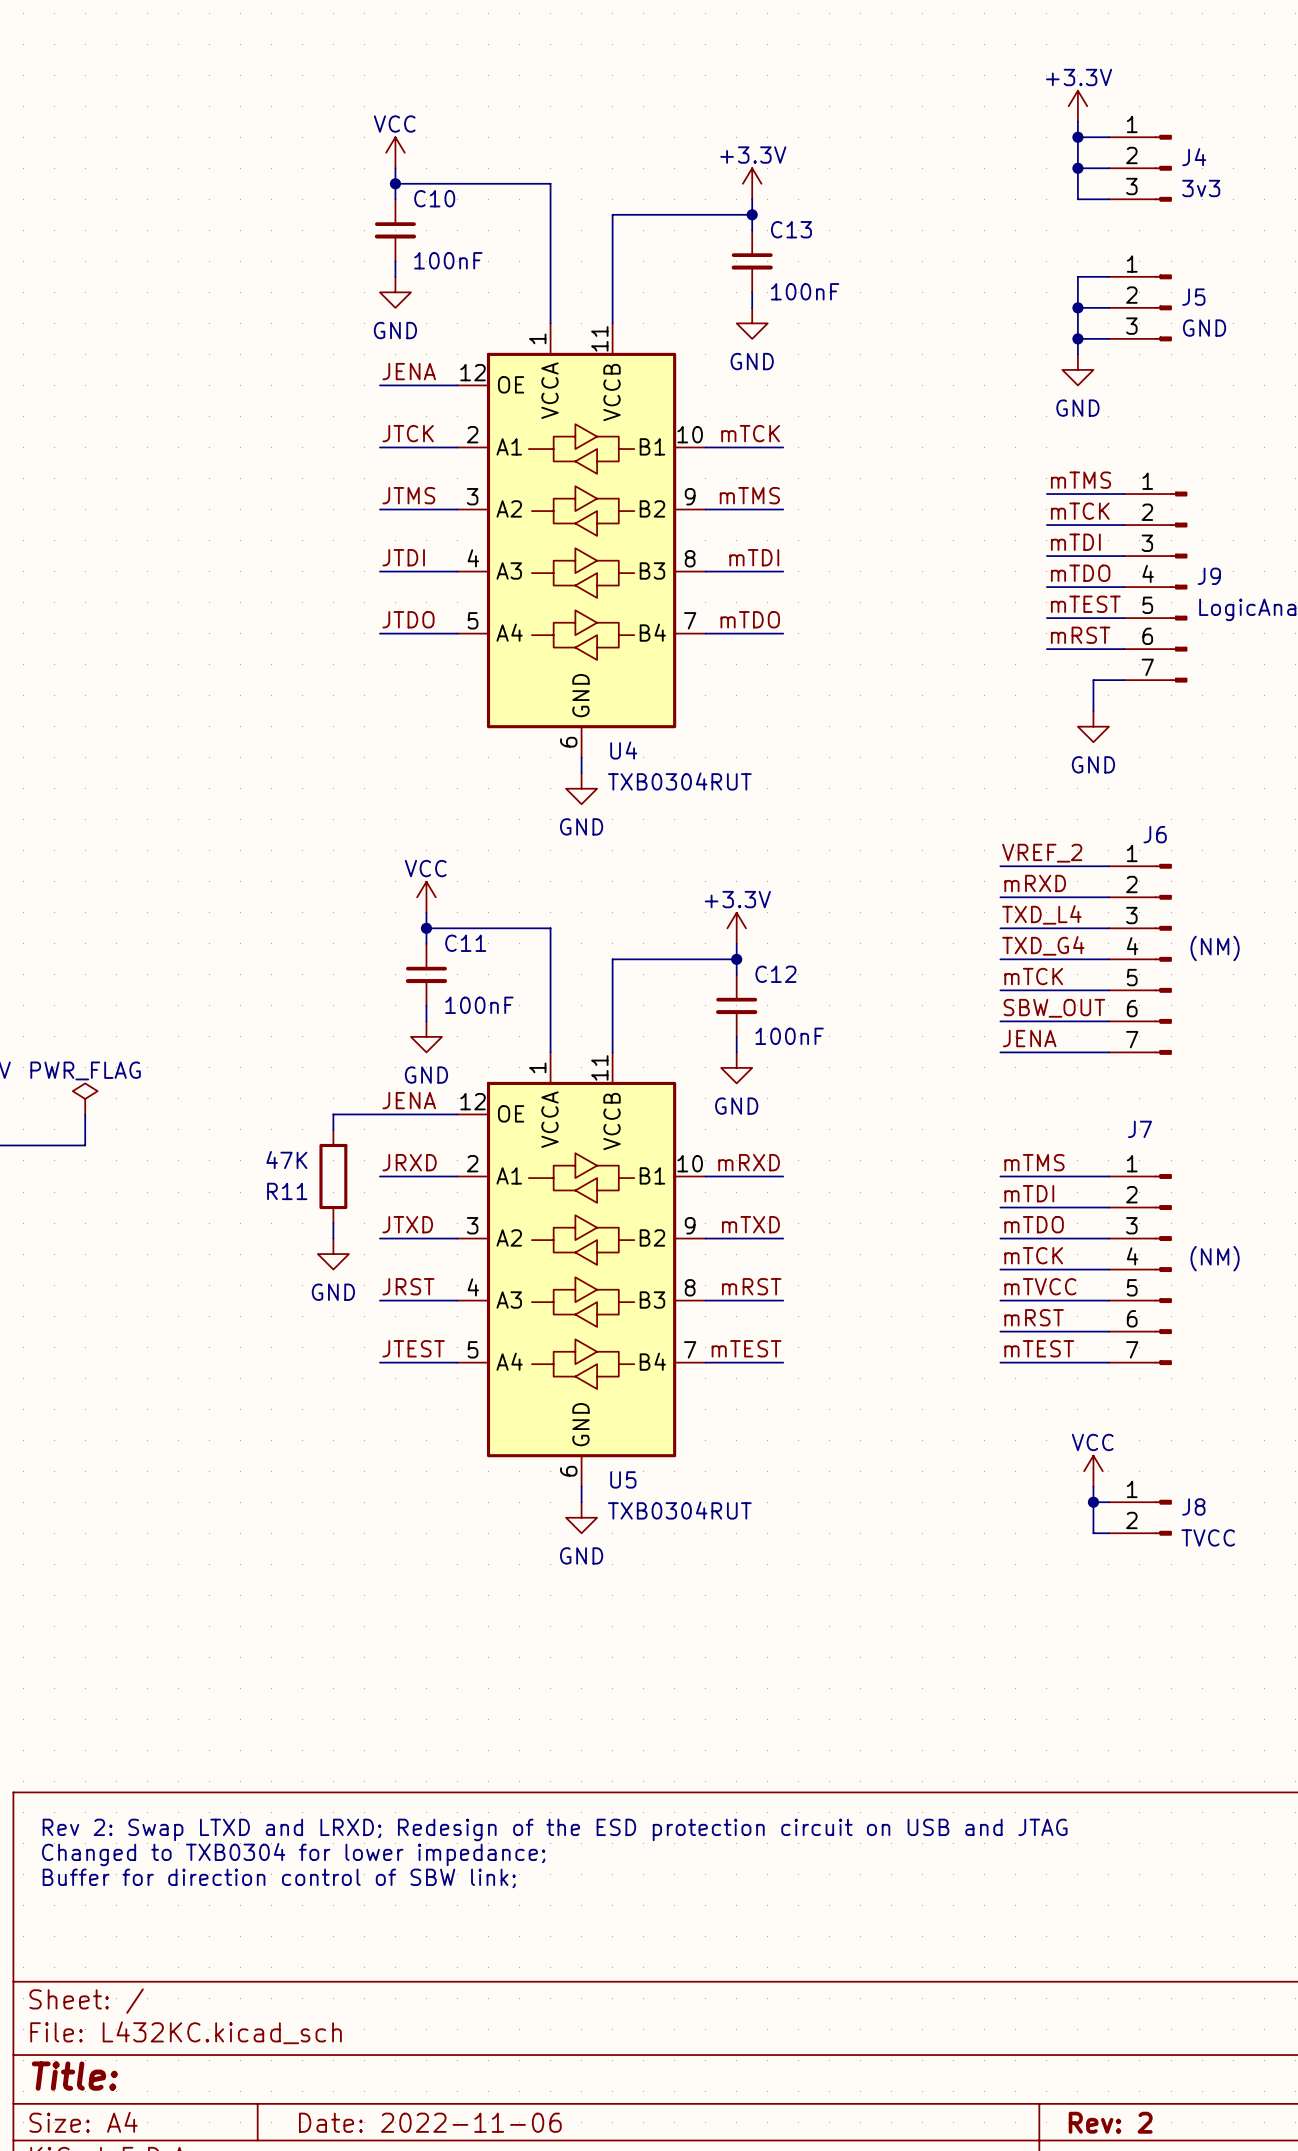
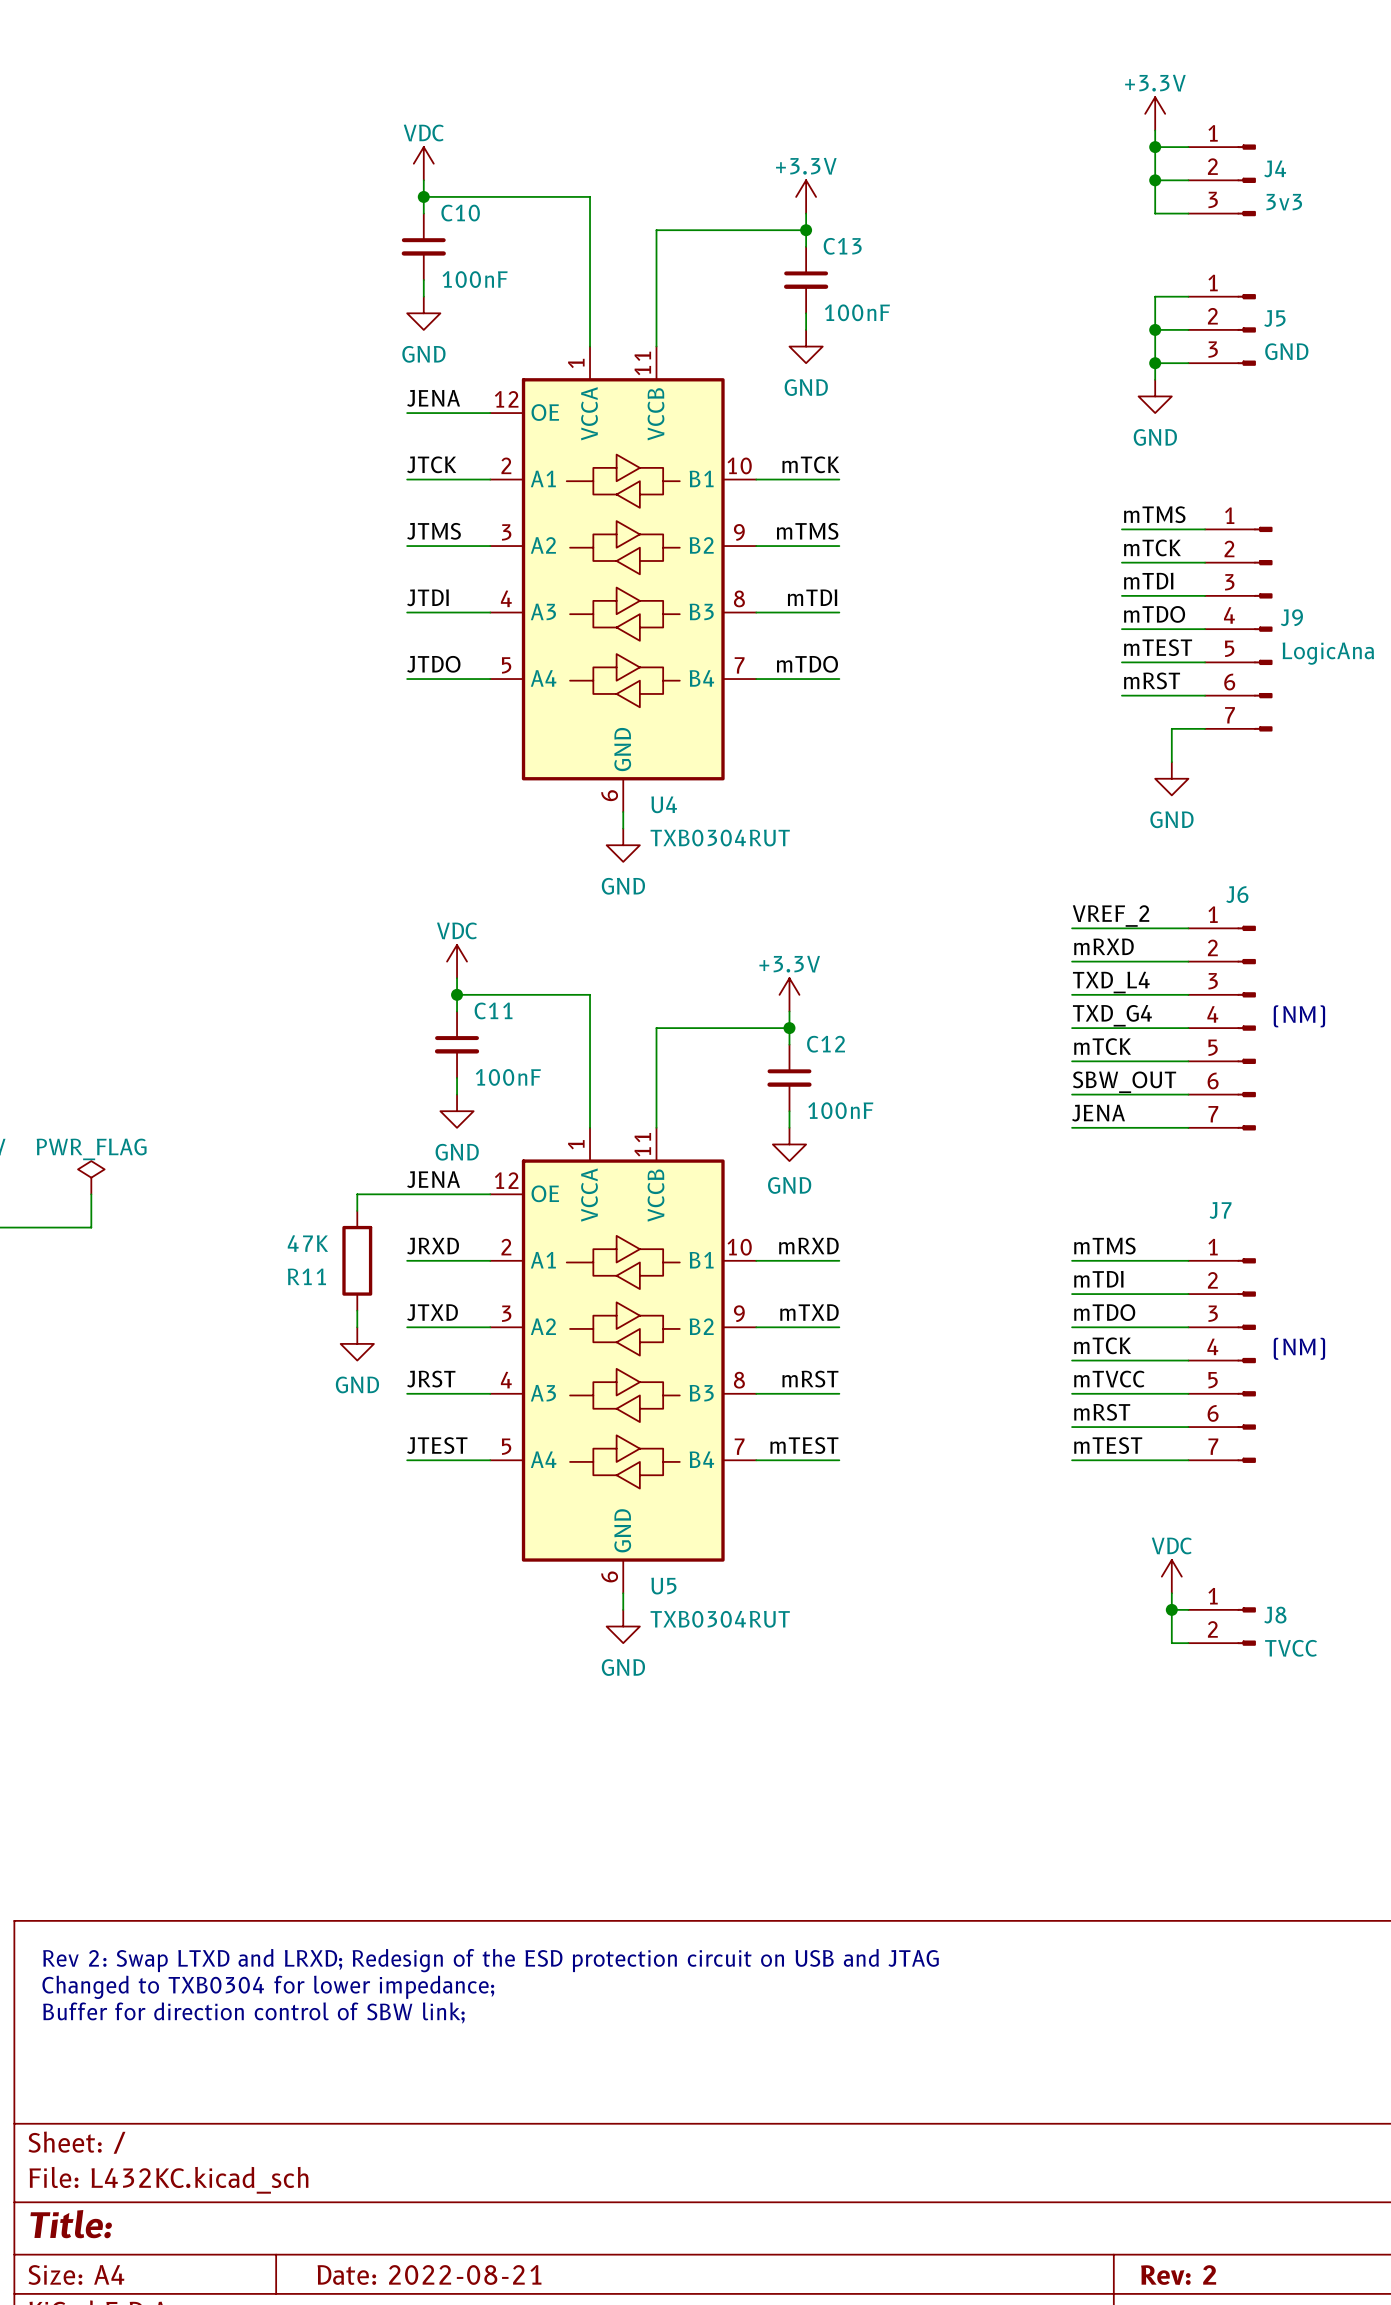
power symbol: VCC (395, 152) -> VDC (423, 163)
power symbol: VCC (426, 897) -> VDC (457, 961)
power symbol: VCC (1093, 1471) -> VDC (1171, 1576)
title block: Date: 2022-11-06 (430, 2122) -> Date: 2022-08-21 (429, 2274)

